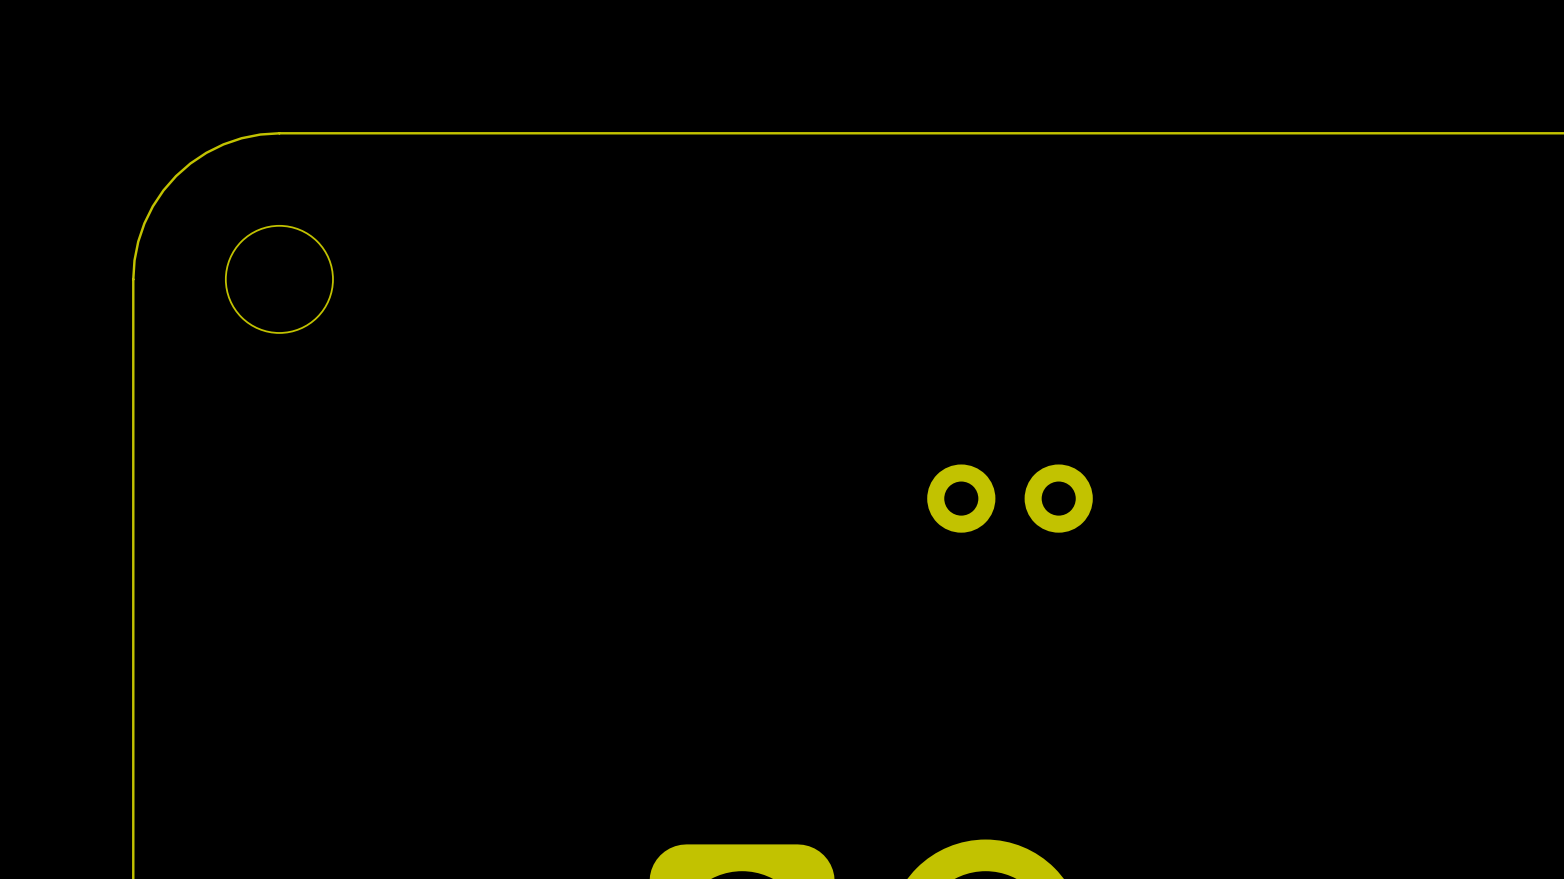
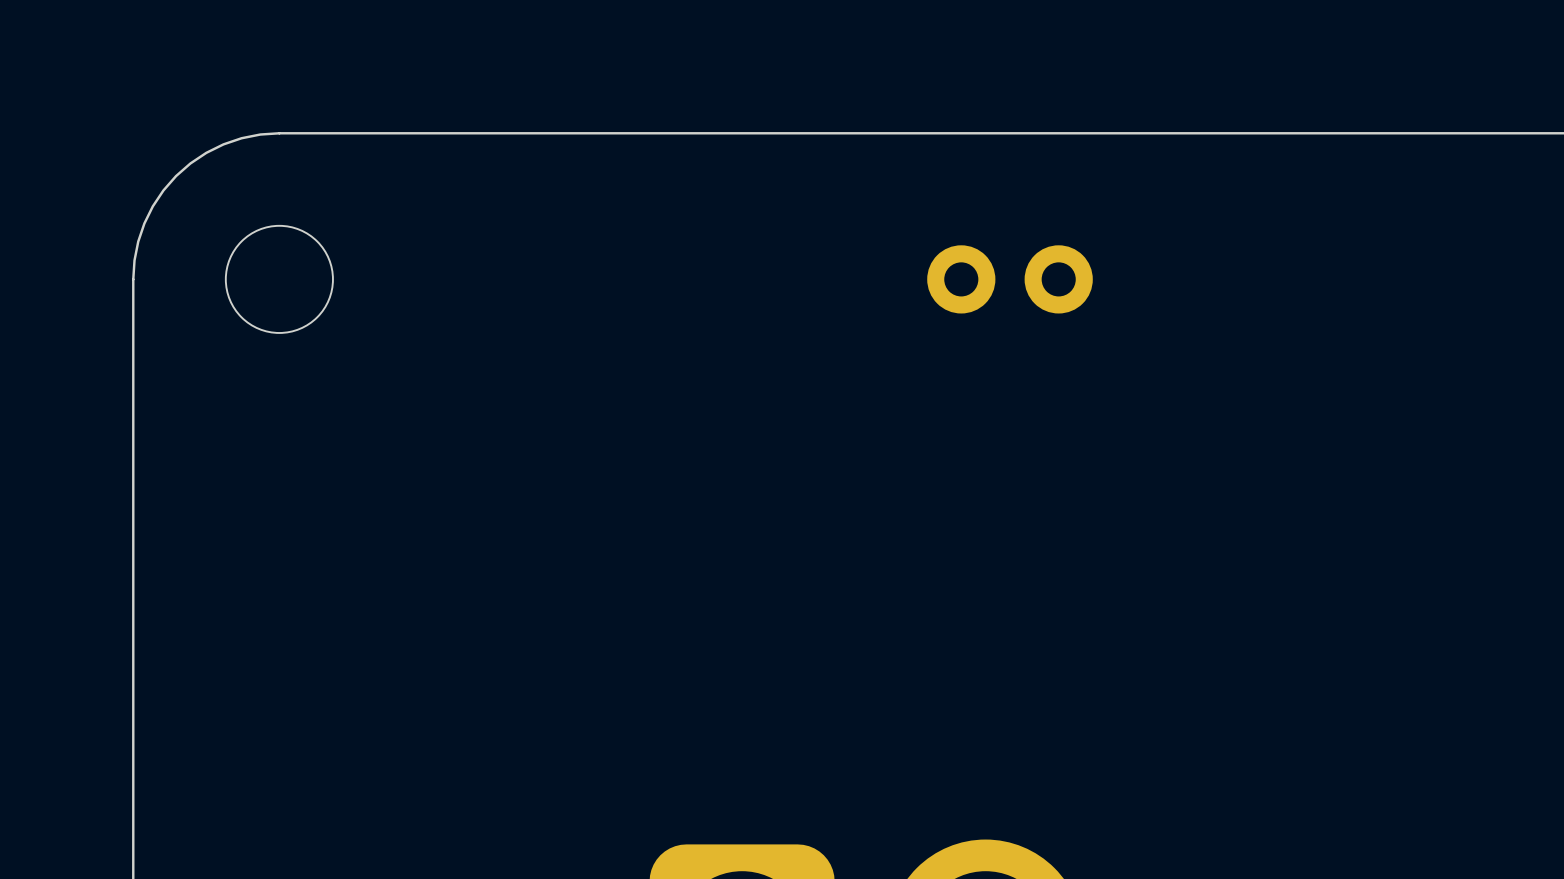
part position: (1010, 498) -> (1010, 279)

